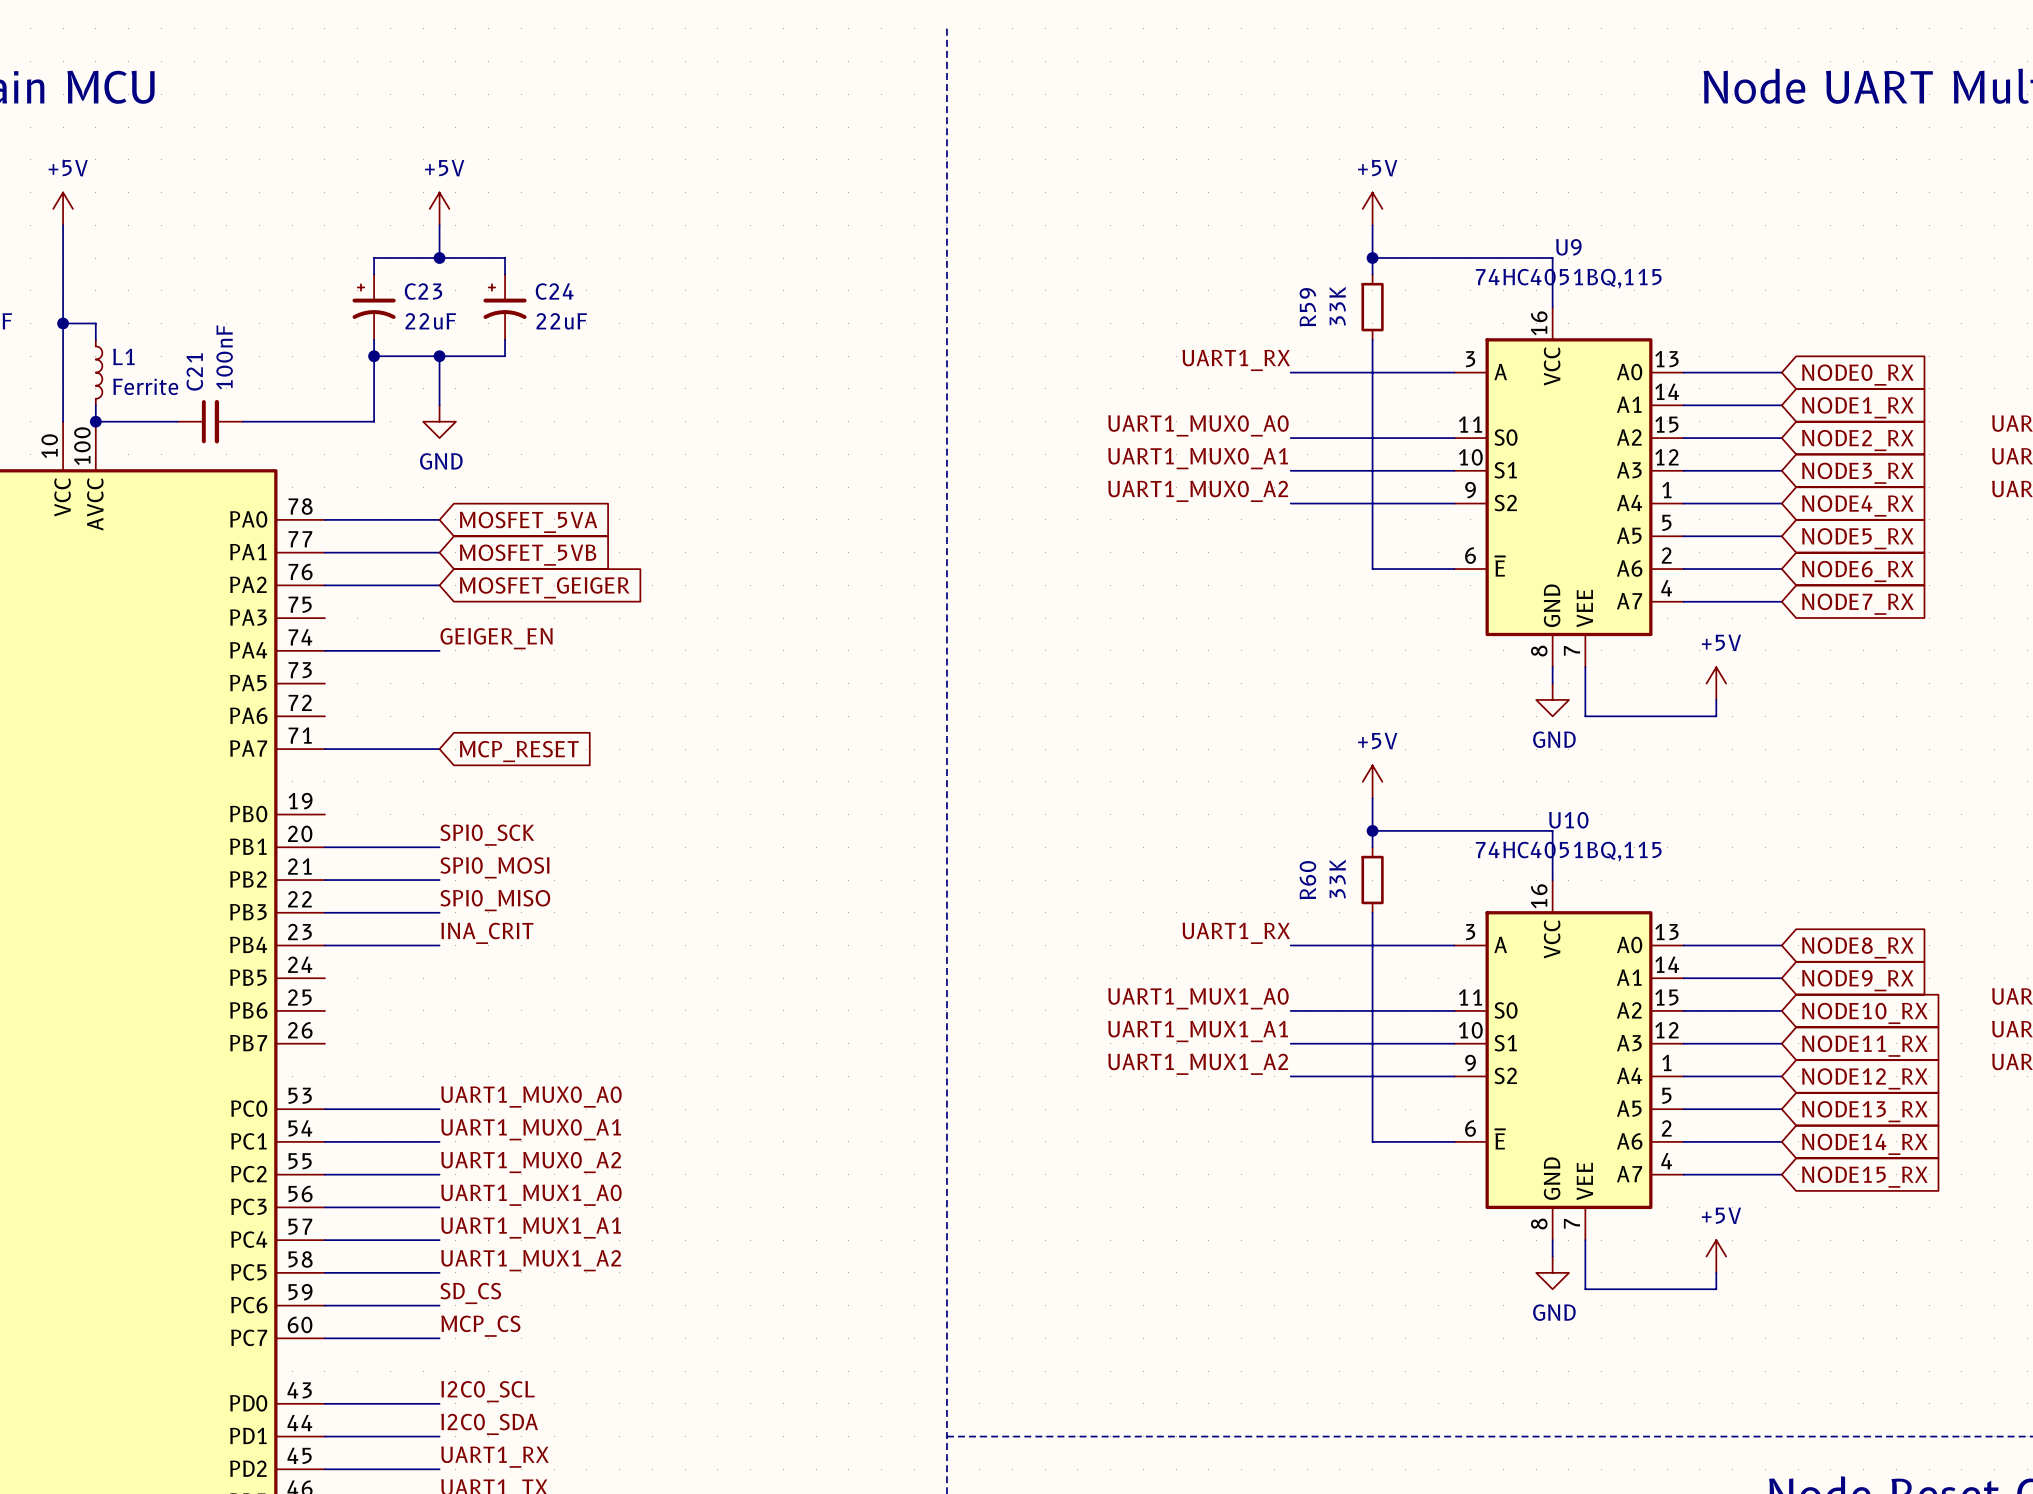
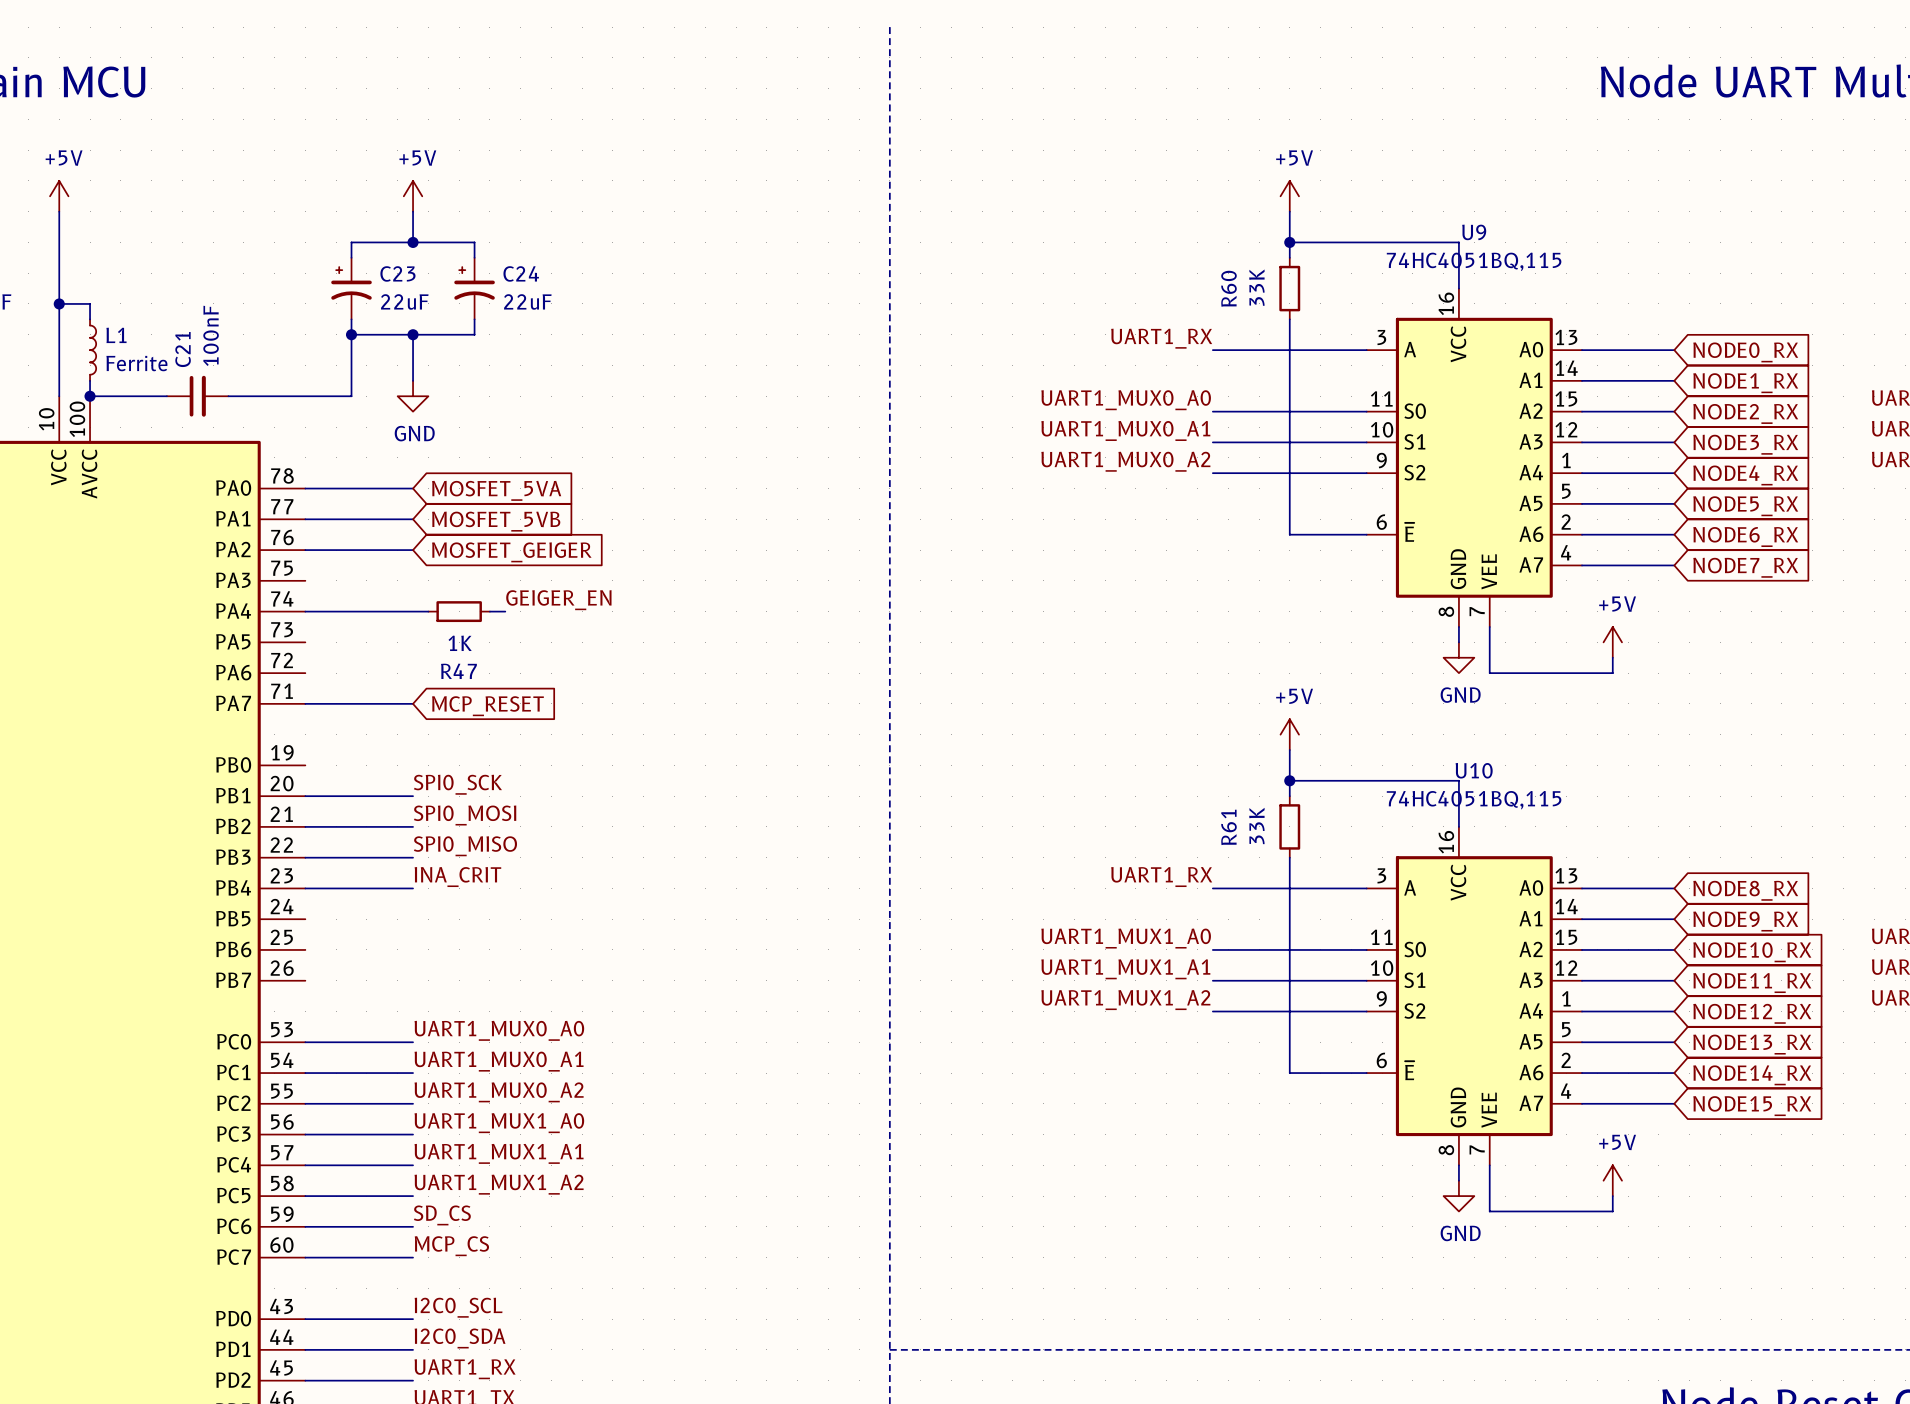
R59 name: R59 (1307, 307) -> R60 (1228, 288)
label position: GEIGER_EN (496, 638) -> GEIGER_EN (558, 600)
wire: none -> (413, 611) (428, 611)
R47: none -> 1K (459, 611)
wire: none -> (489, 611) (505, 611)
R60 name: R60 (1307, 880) -> R61 (1228, 827)

